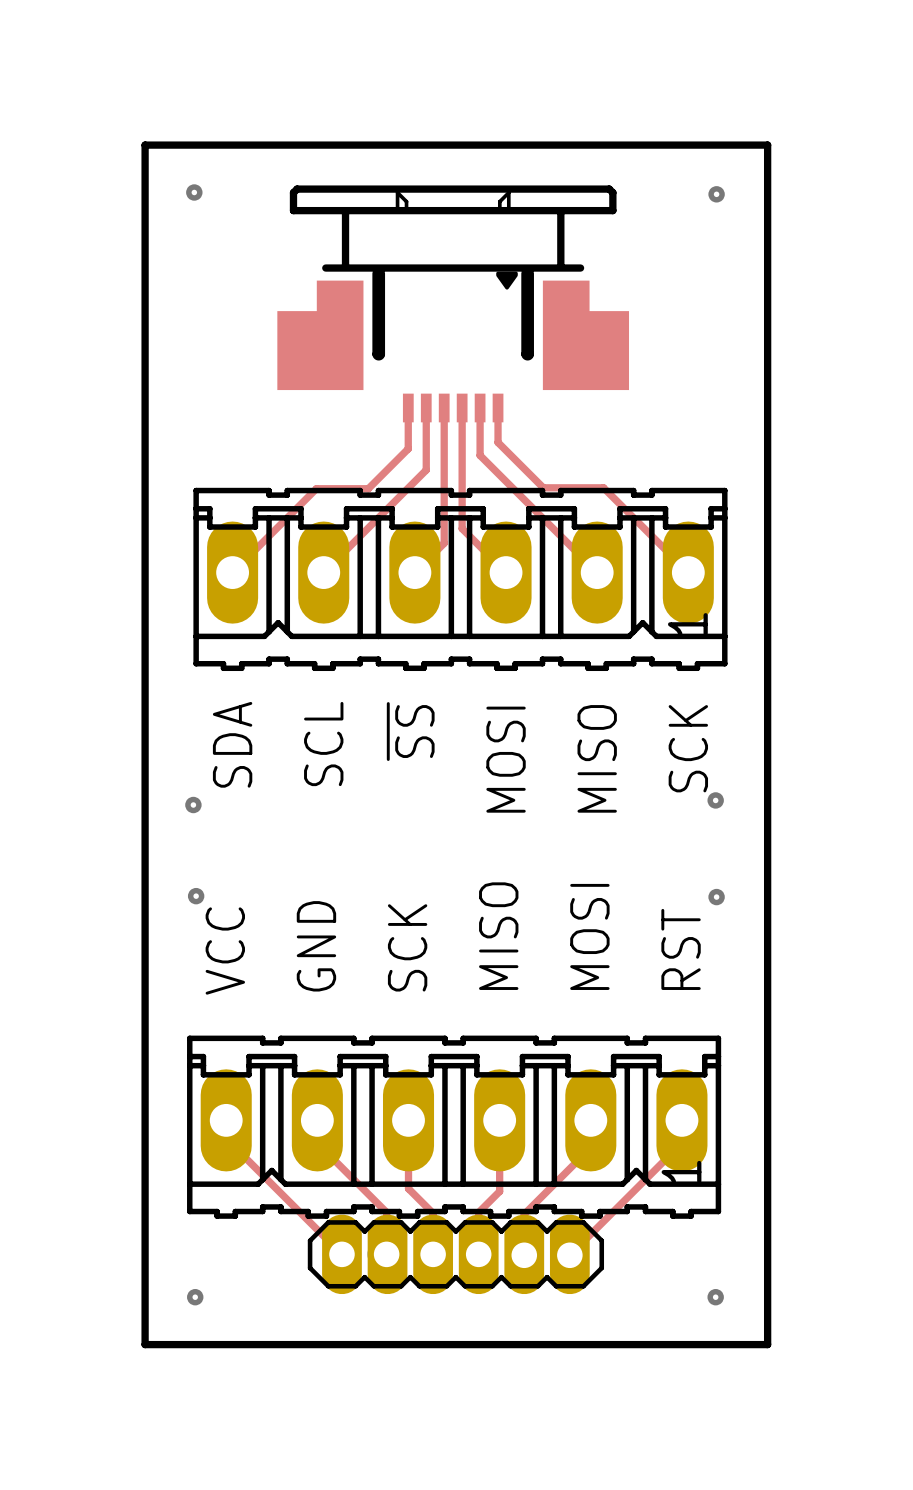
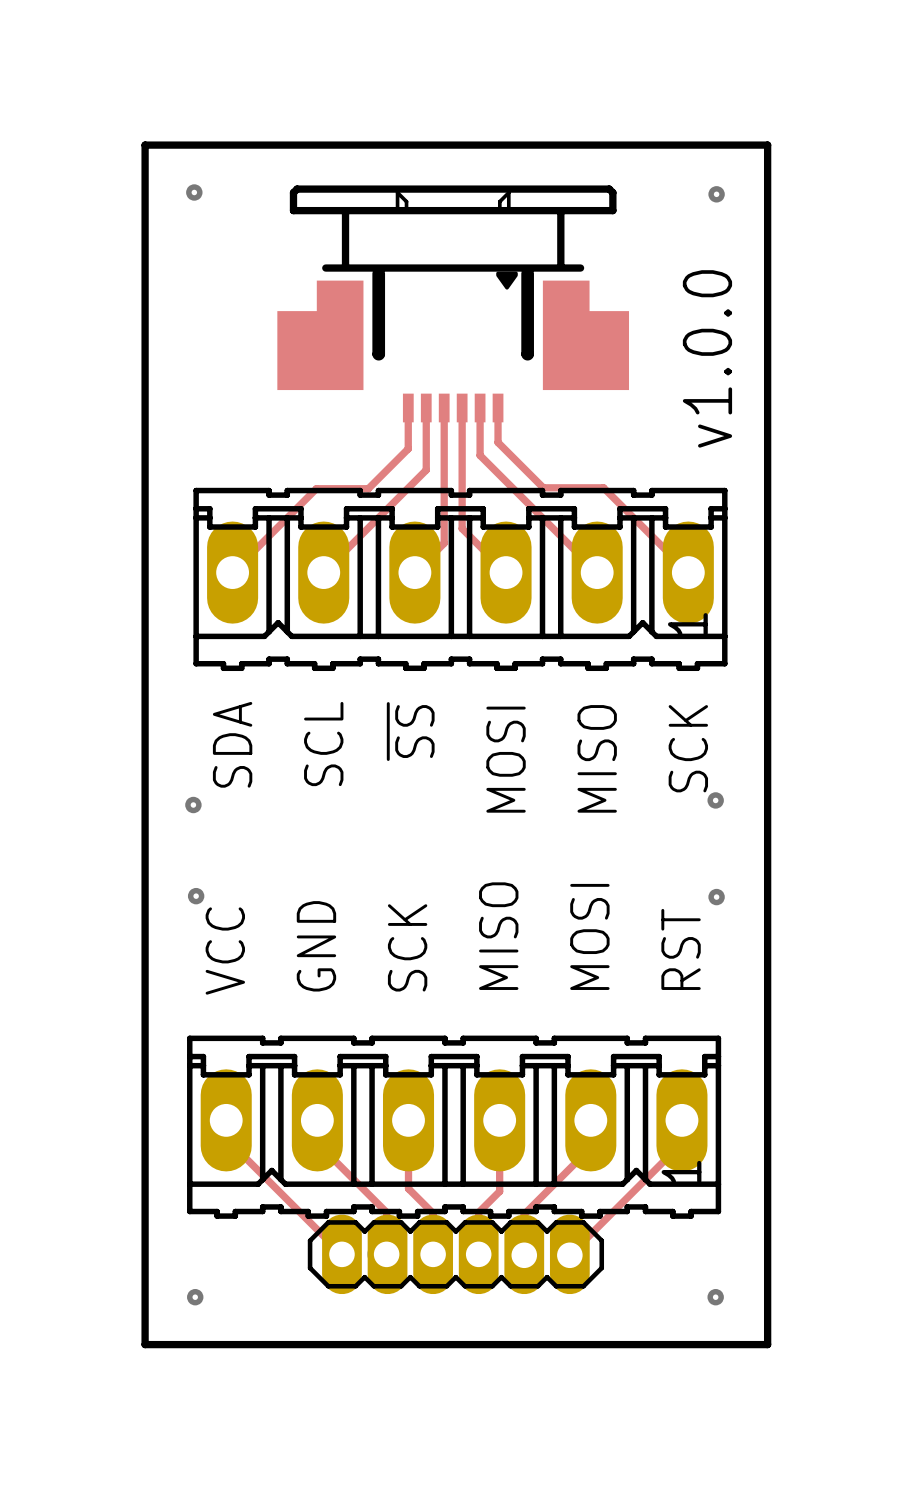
text: none -> v1.0.0 (707, 358)

